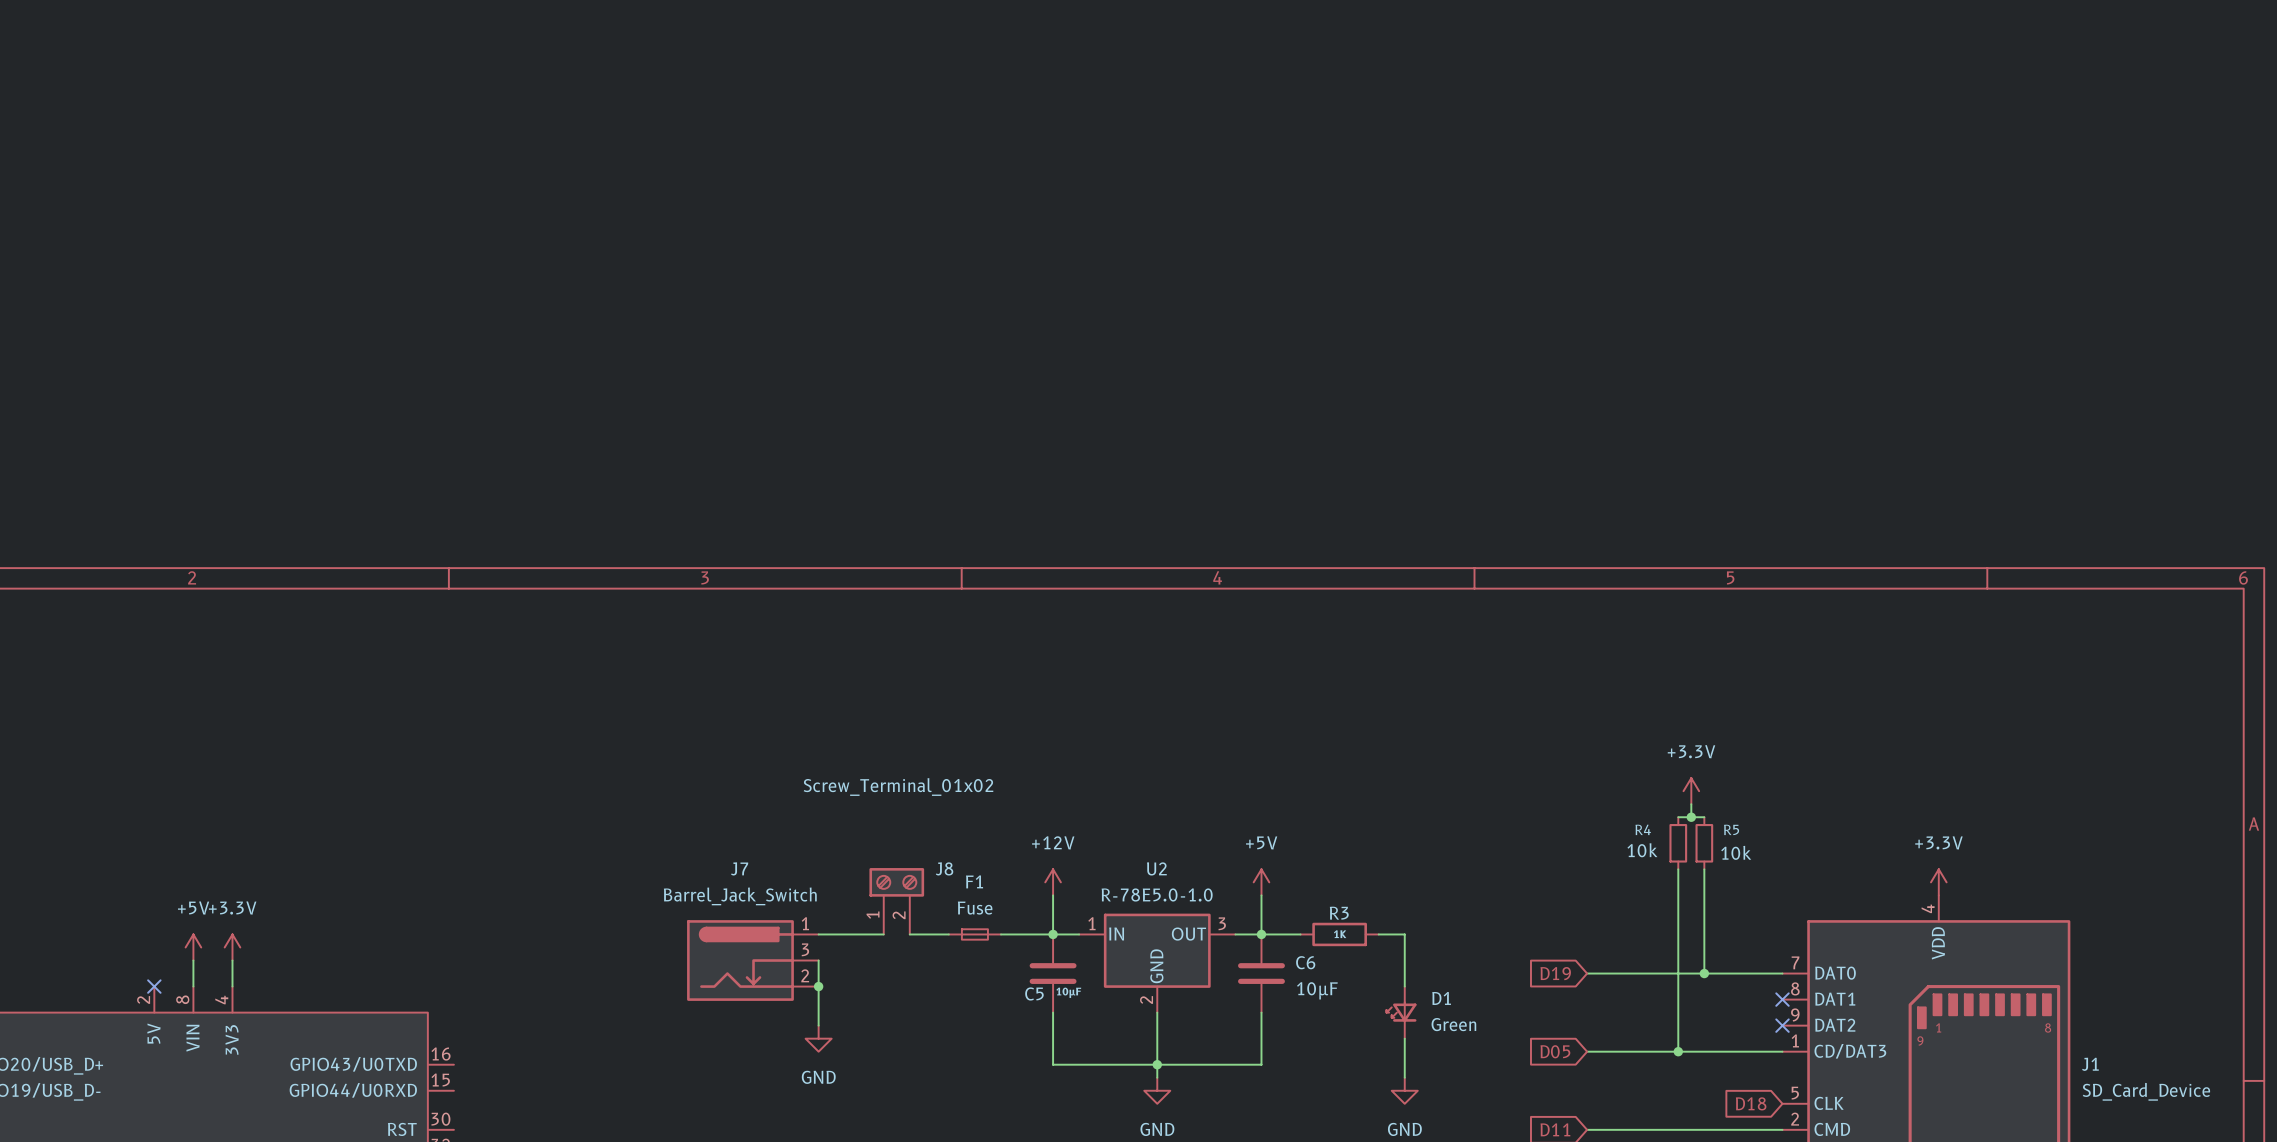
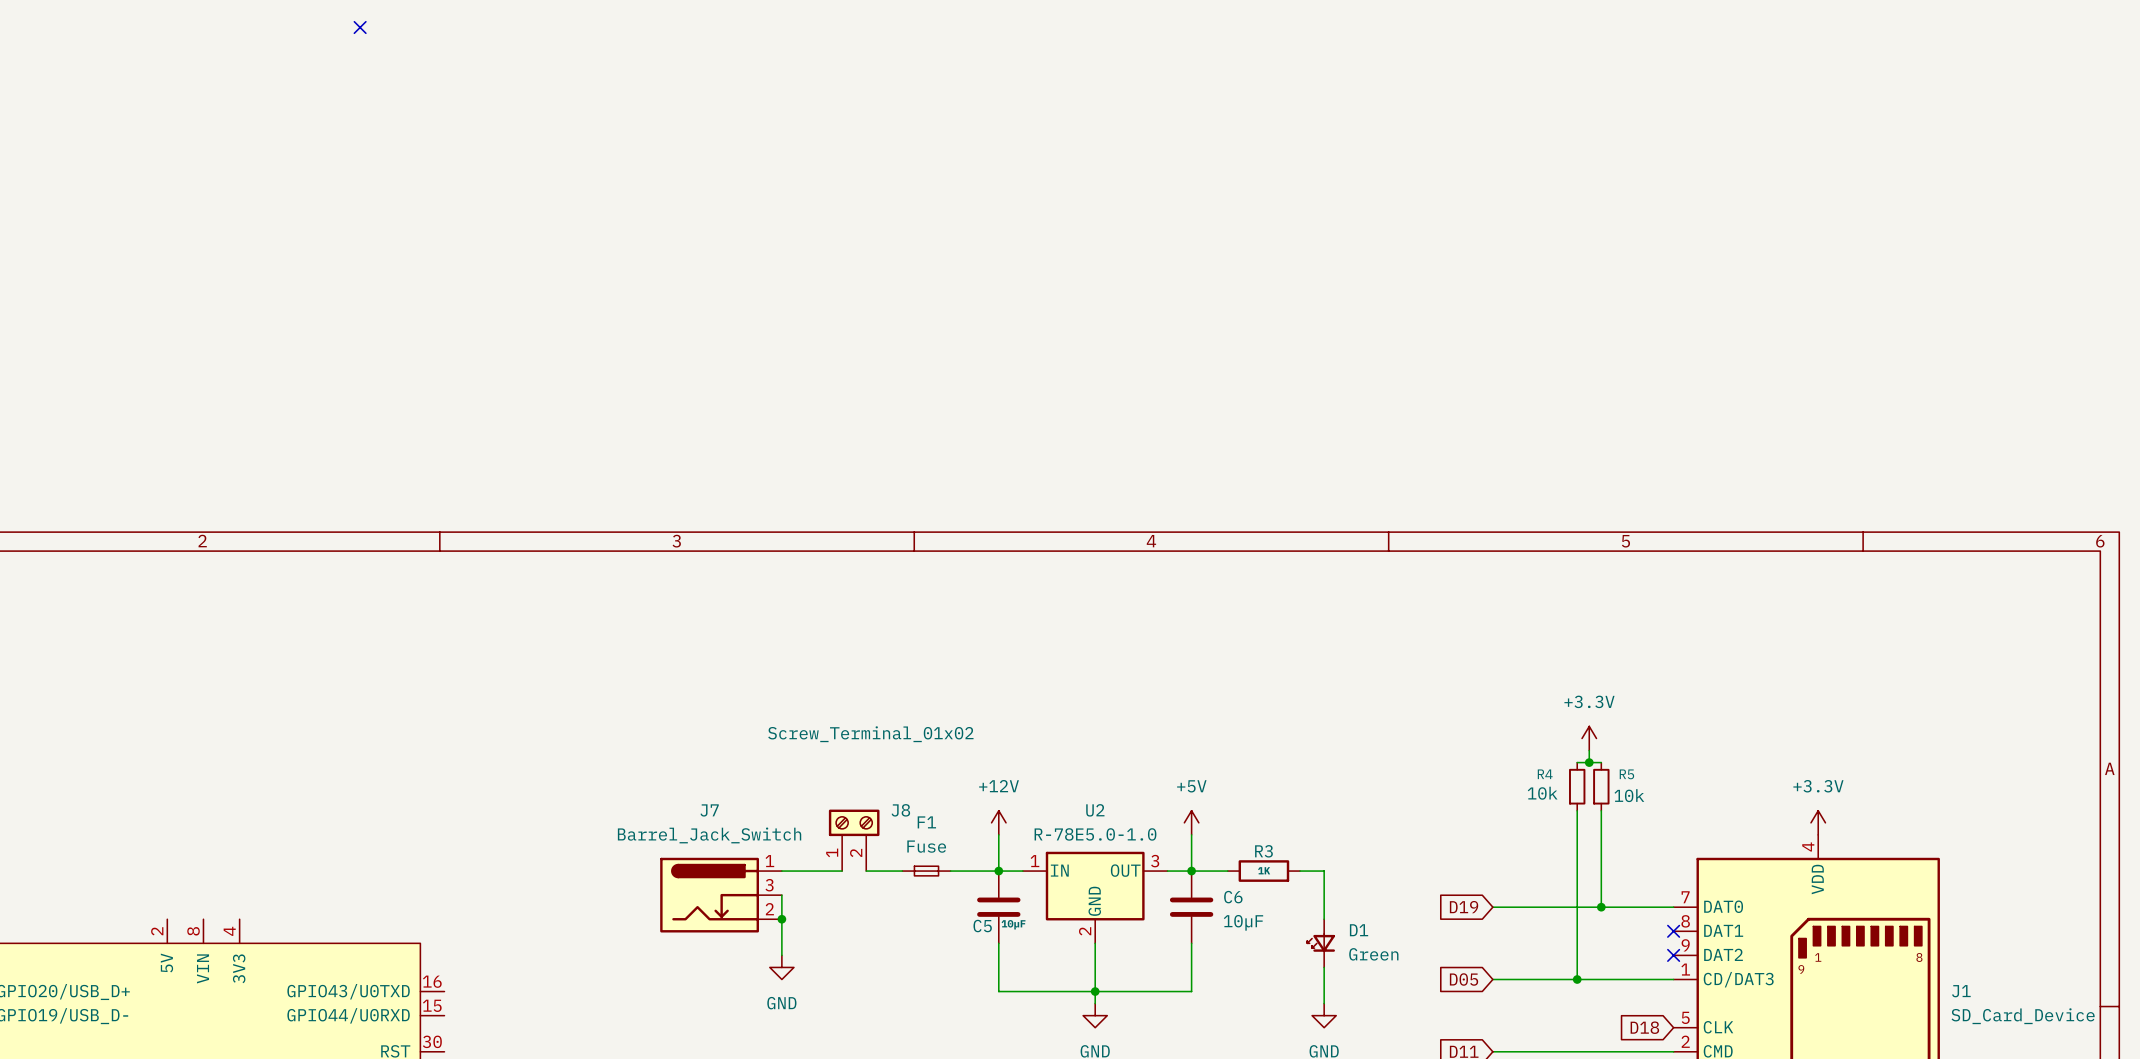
no-connect mark: none -> (360, 27)
power symbol: +5V (193, 947) -> none
power symbol: +3.3V (232, 947) -> none
wire: (193, 960) (193, 986) -> none
wire: (232, 960) (232, 986) -> none
no-connect mark: (154, 986) -> none

